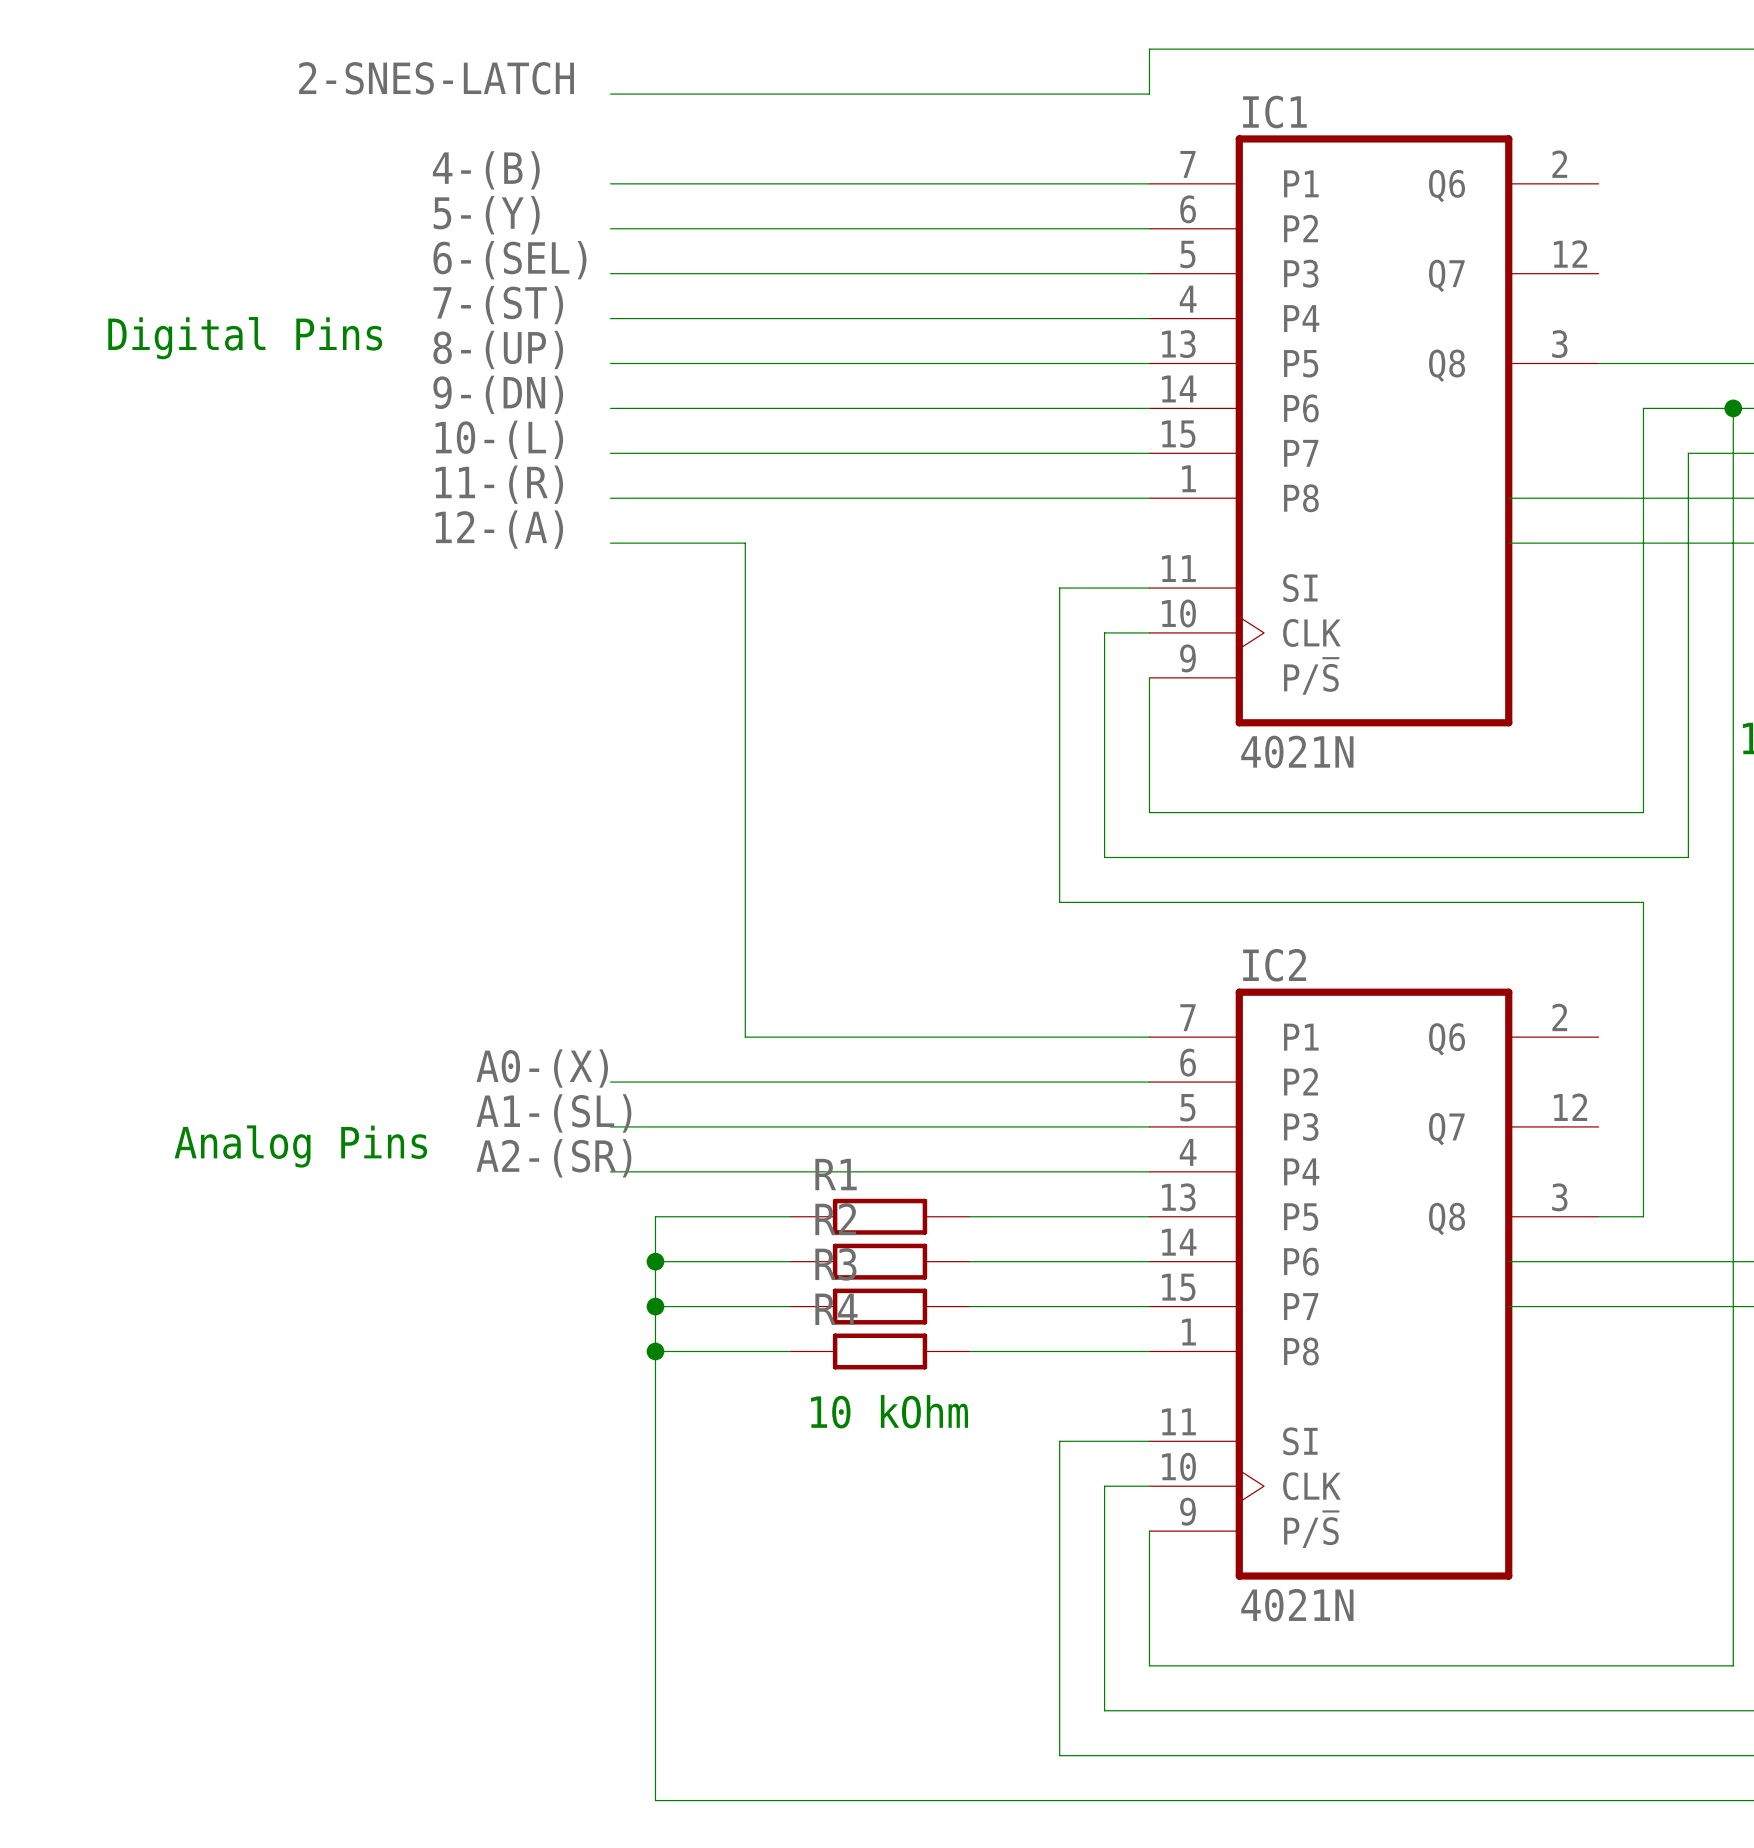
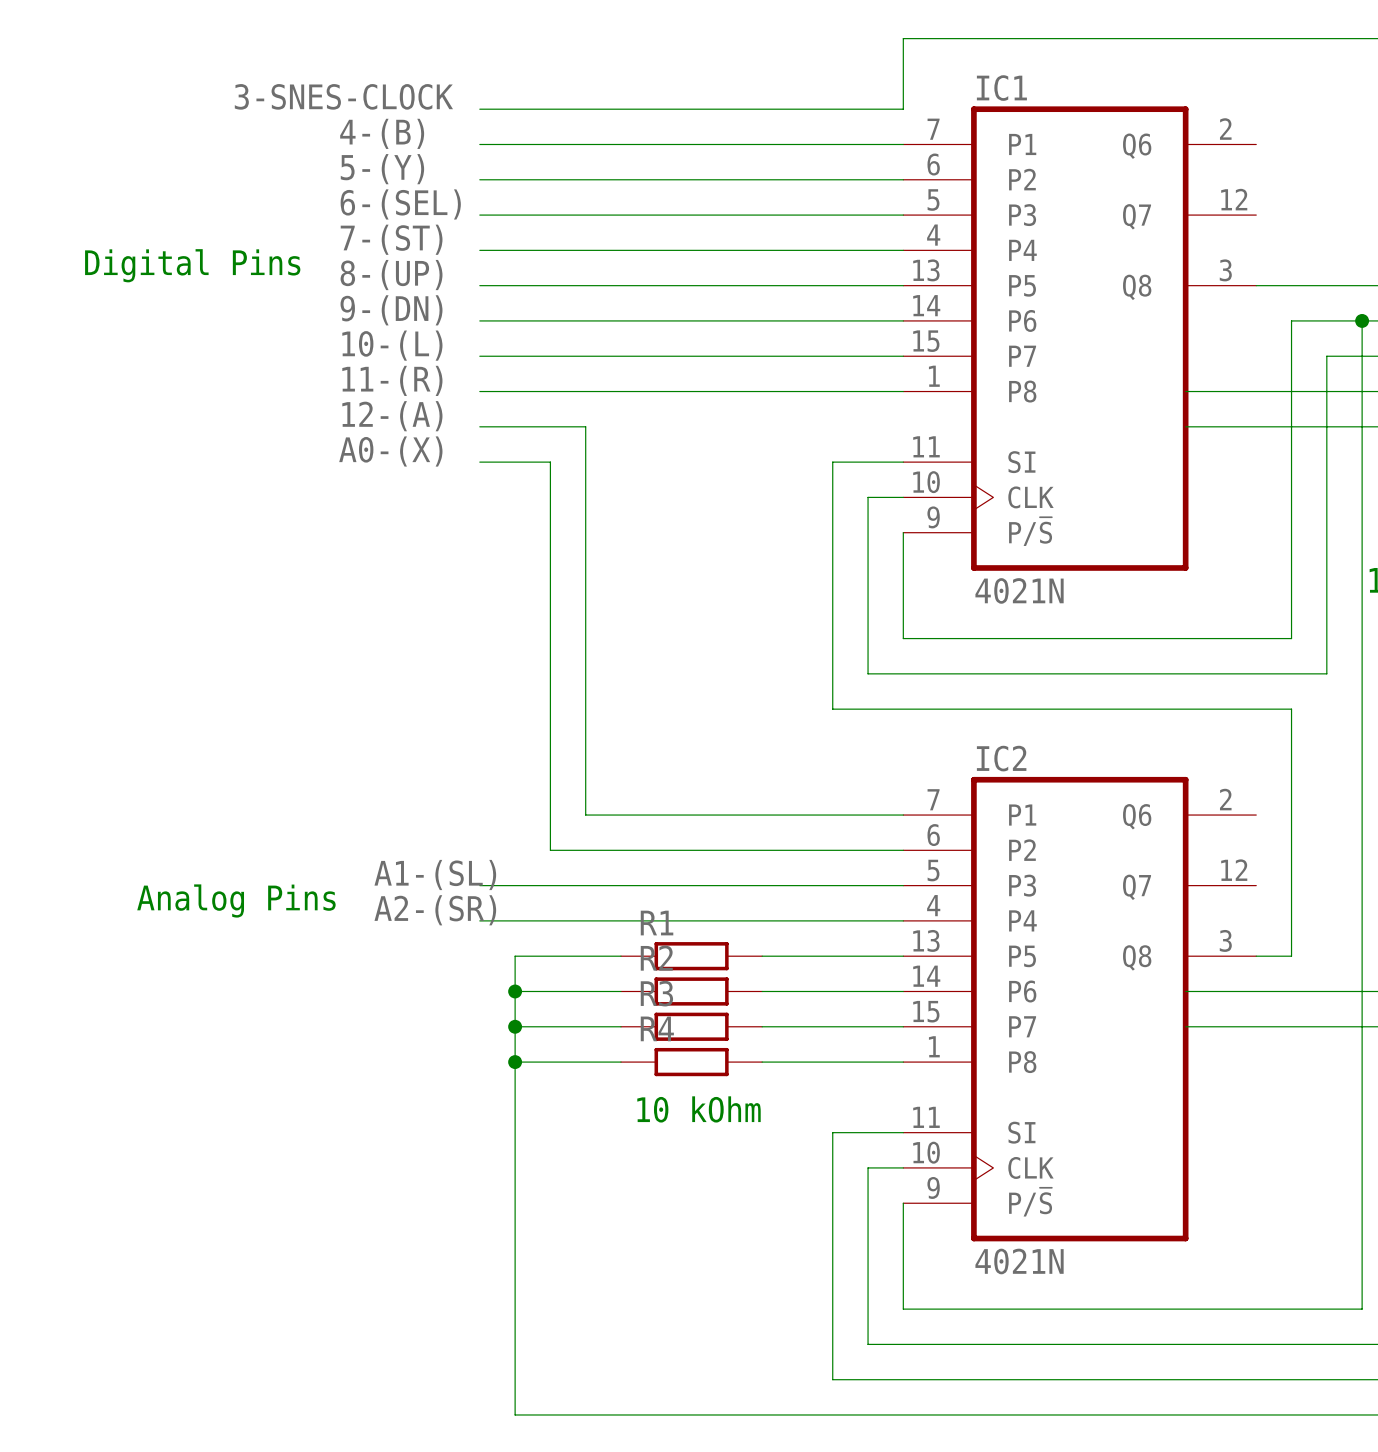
label: 2-SNES-LATCH (436, 78) -> 3-SNES-CLOCK (343, 96)
wire: (610, 94) (1149, 94) -> (479, 109) (903, 109) (903, 73)
label: none -> A0-(X) (390, 451)
label: A0-(X) (542, 1068) -> none
wire: (610, 1082) (700, 1082) -> (479, 462) (550, 462) (550, 850)

